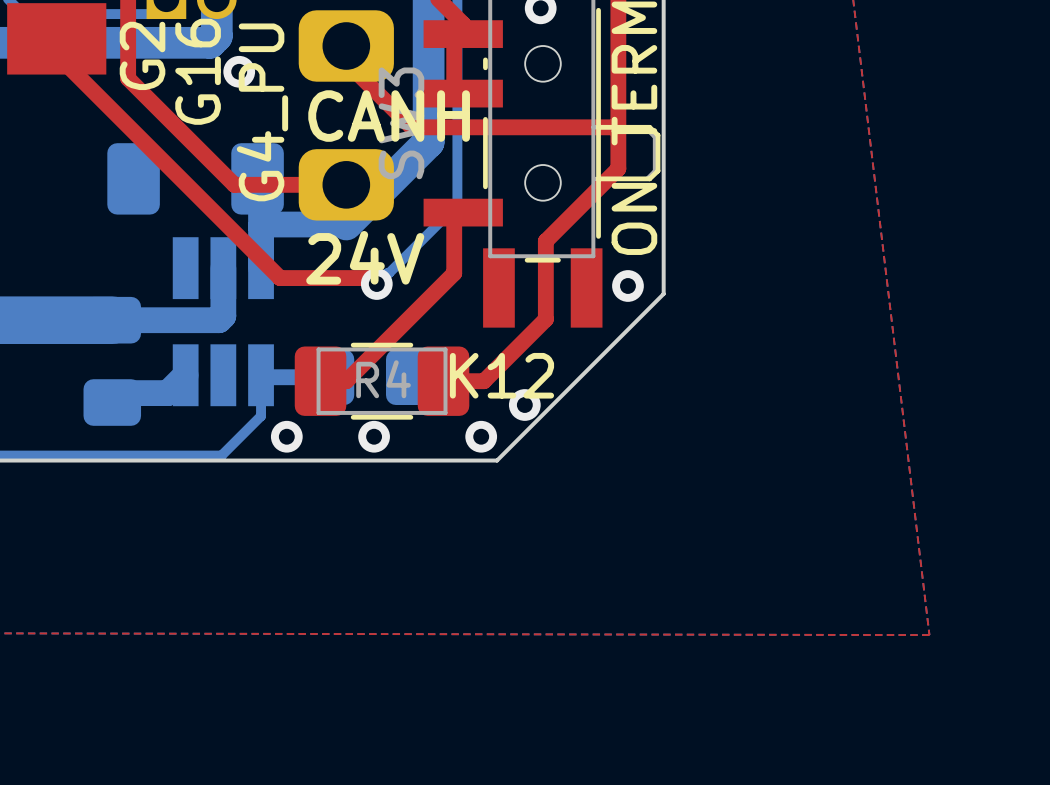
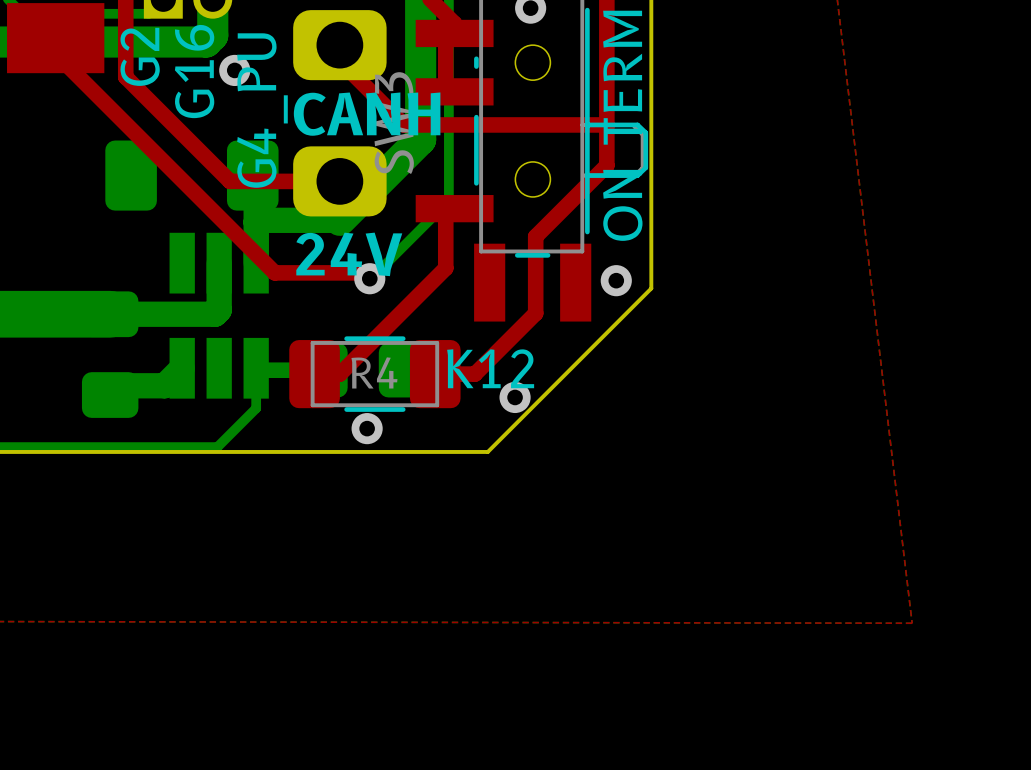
via: (286, 436) -> none
via: (481, 436) -> none

